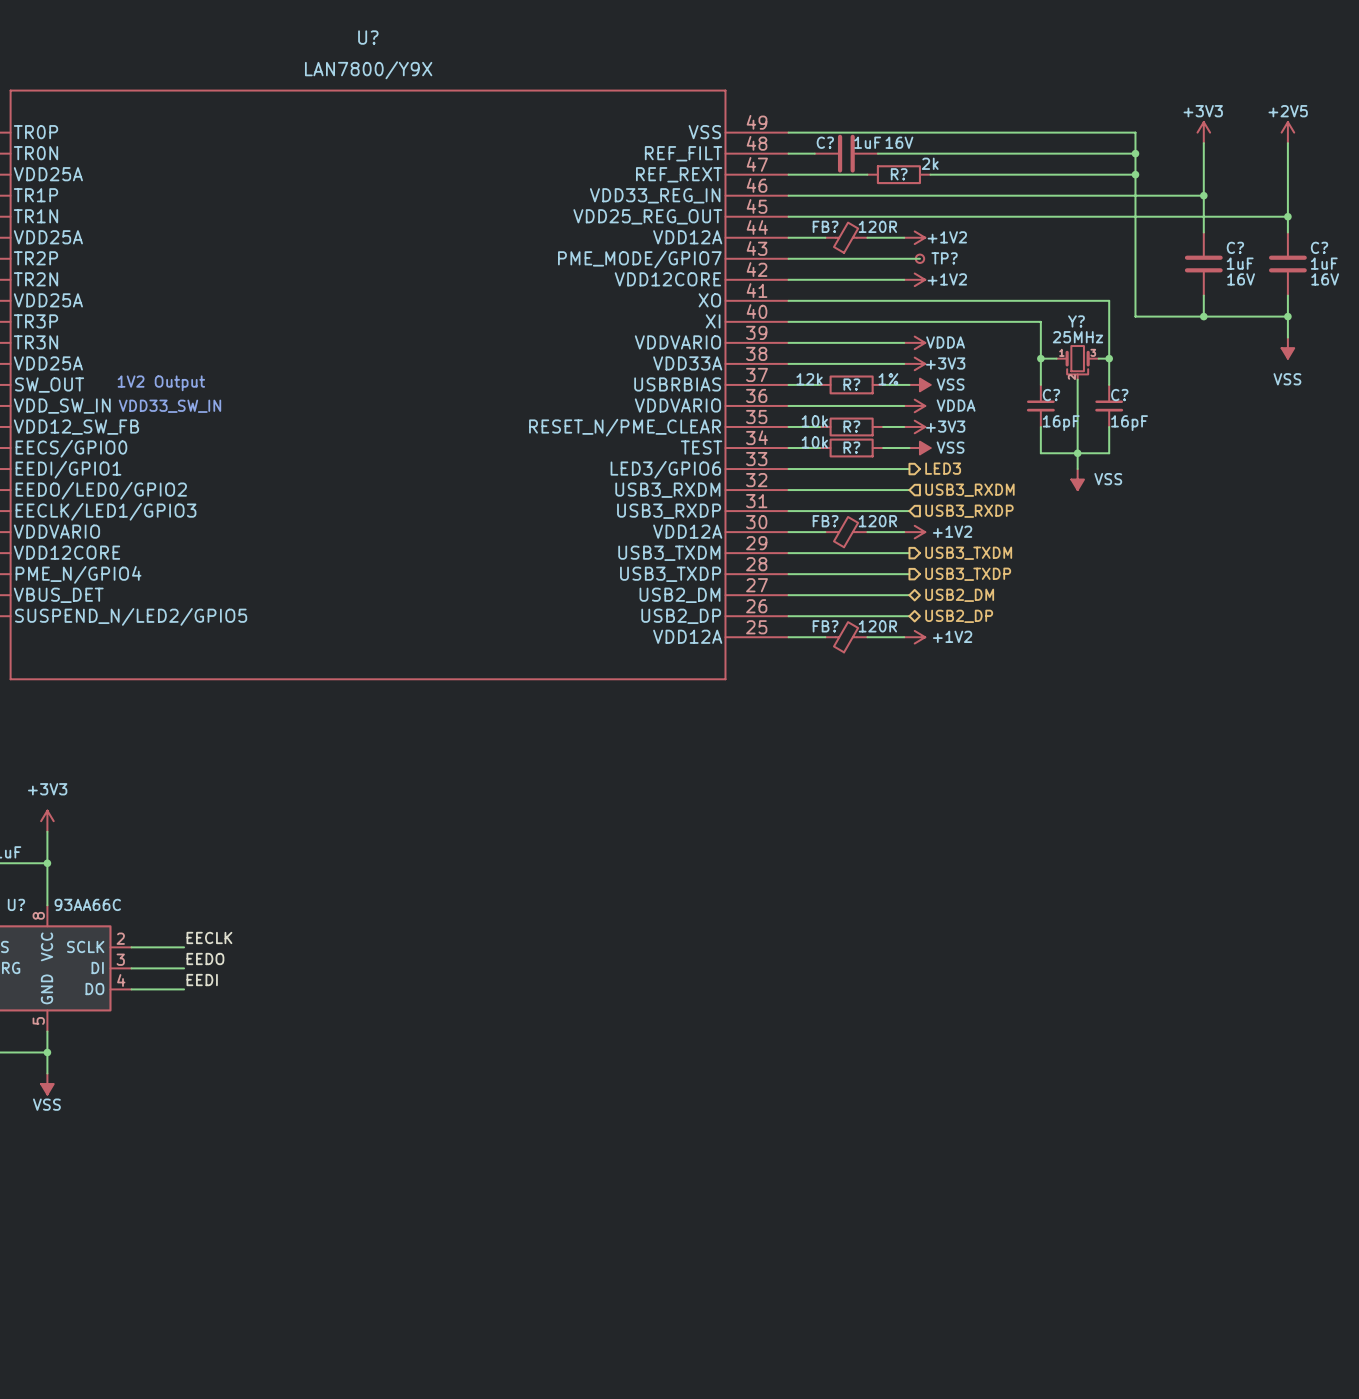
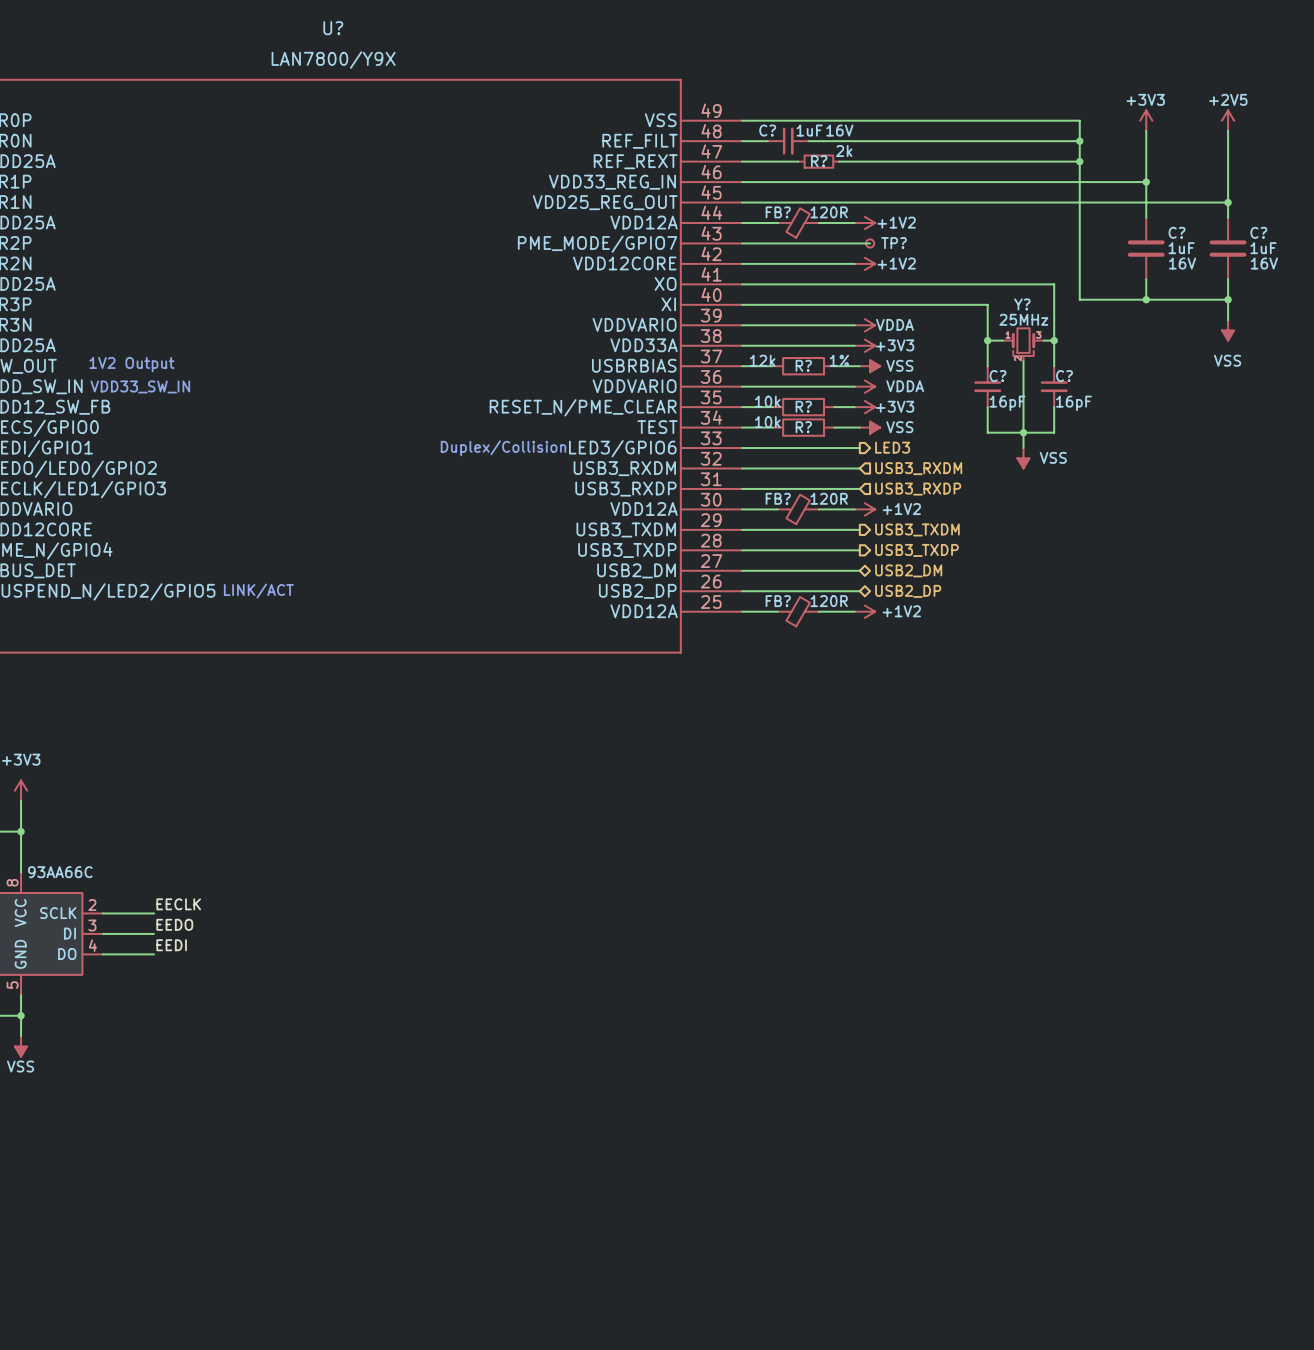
C?: none -> 1uF (788, 141)
C?: 1uF (846, 153) -> none
R?: none -> 2k (818, 161)
wire: none -> (839, 161) (880, 161)
R?: 2k (898, 174) -> none
text: none -> Duplex/Collision (503, 448)
text: none -> LINK/ACT (258, 591)

